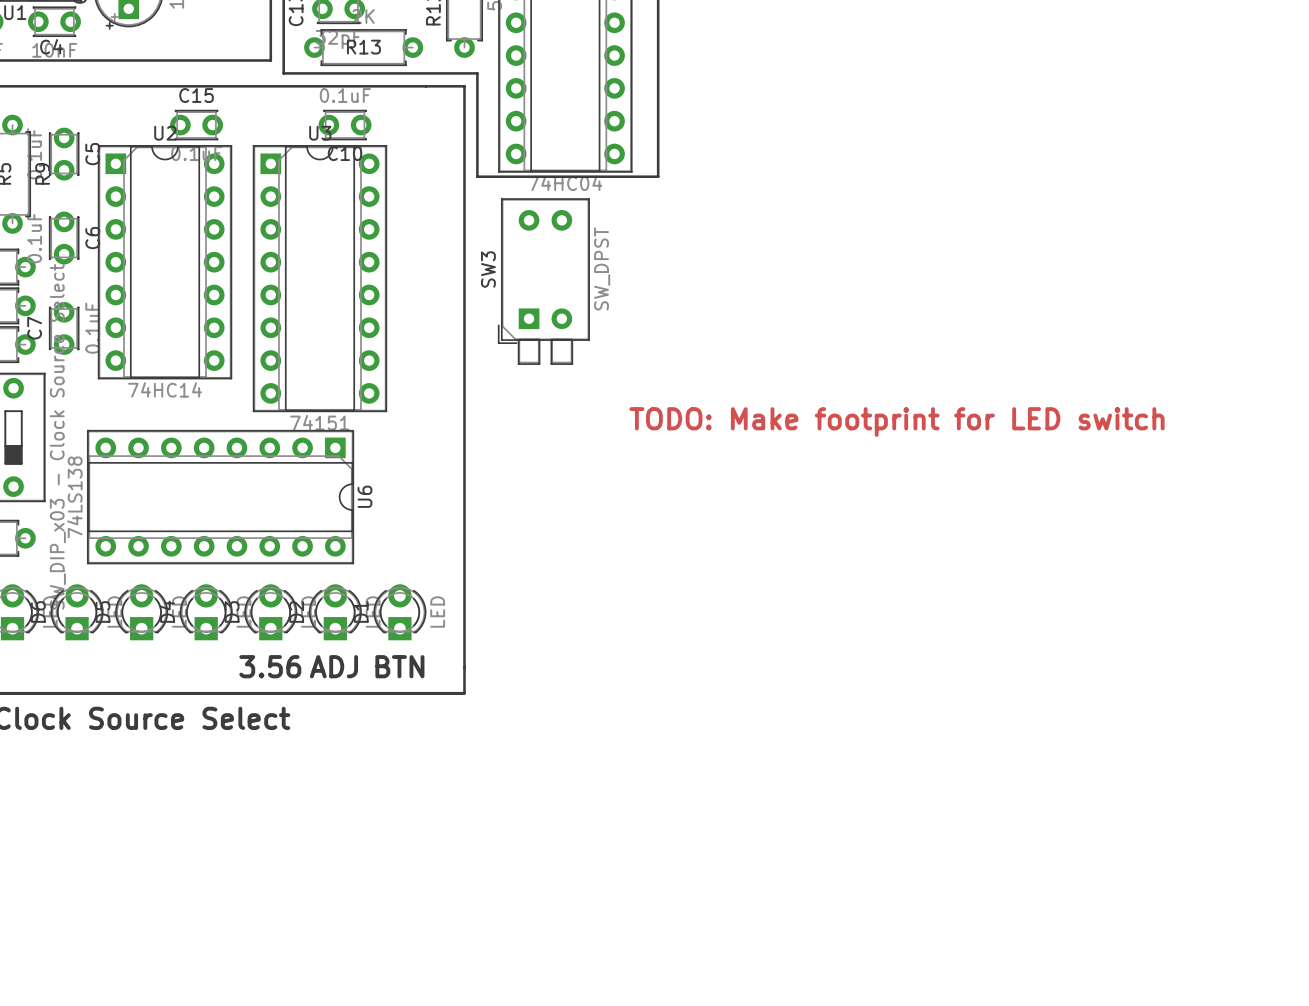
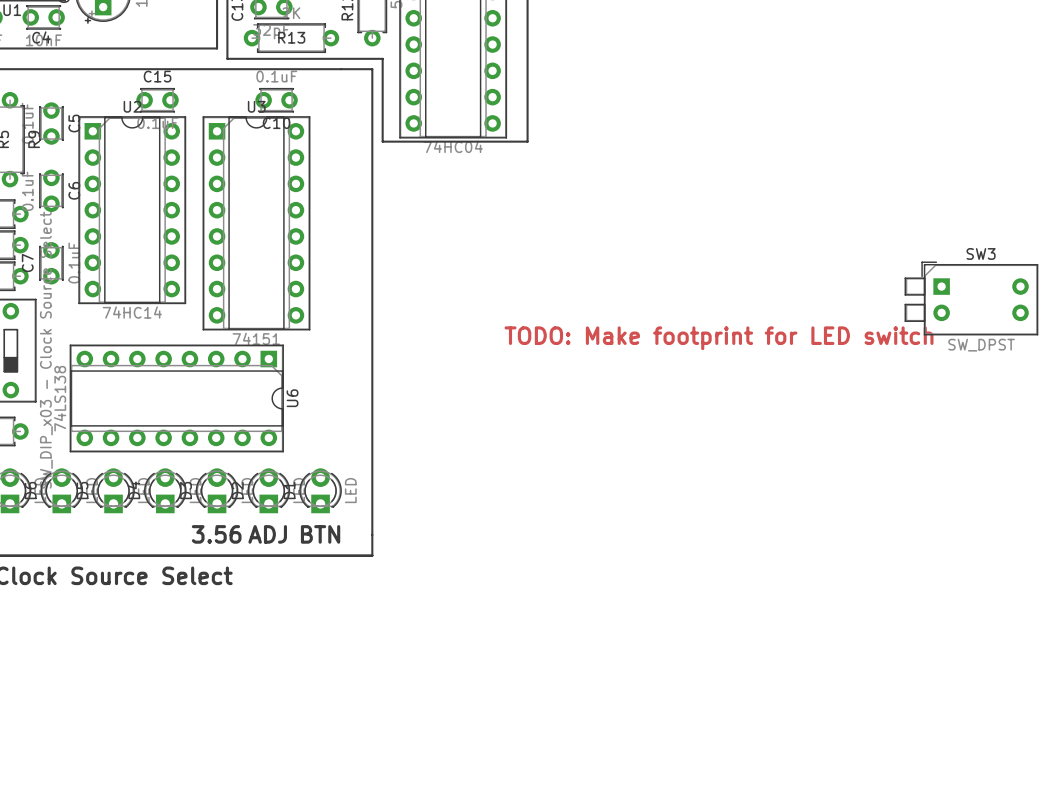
SW3 rotation: 0° (543, 281) -> 90° clockwise (971, 298)
SW3 position: (543, 281) -> (971, 298)

